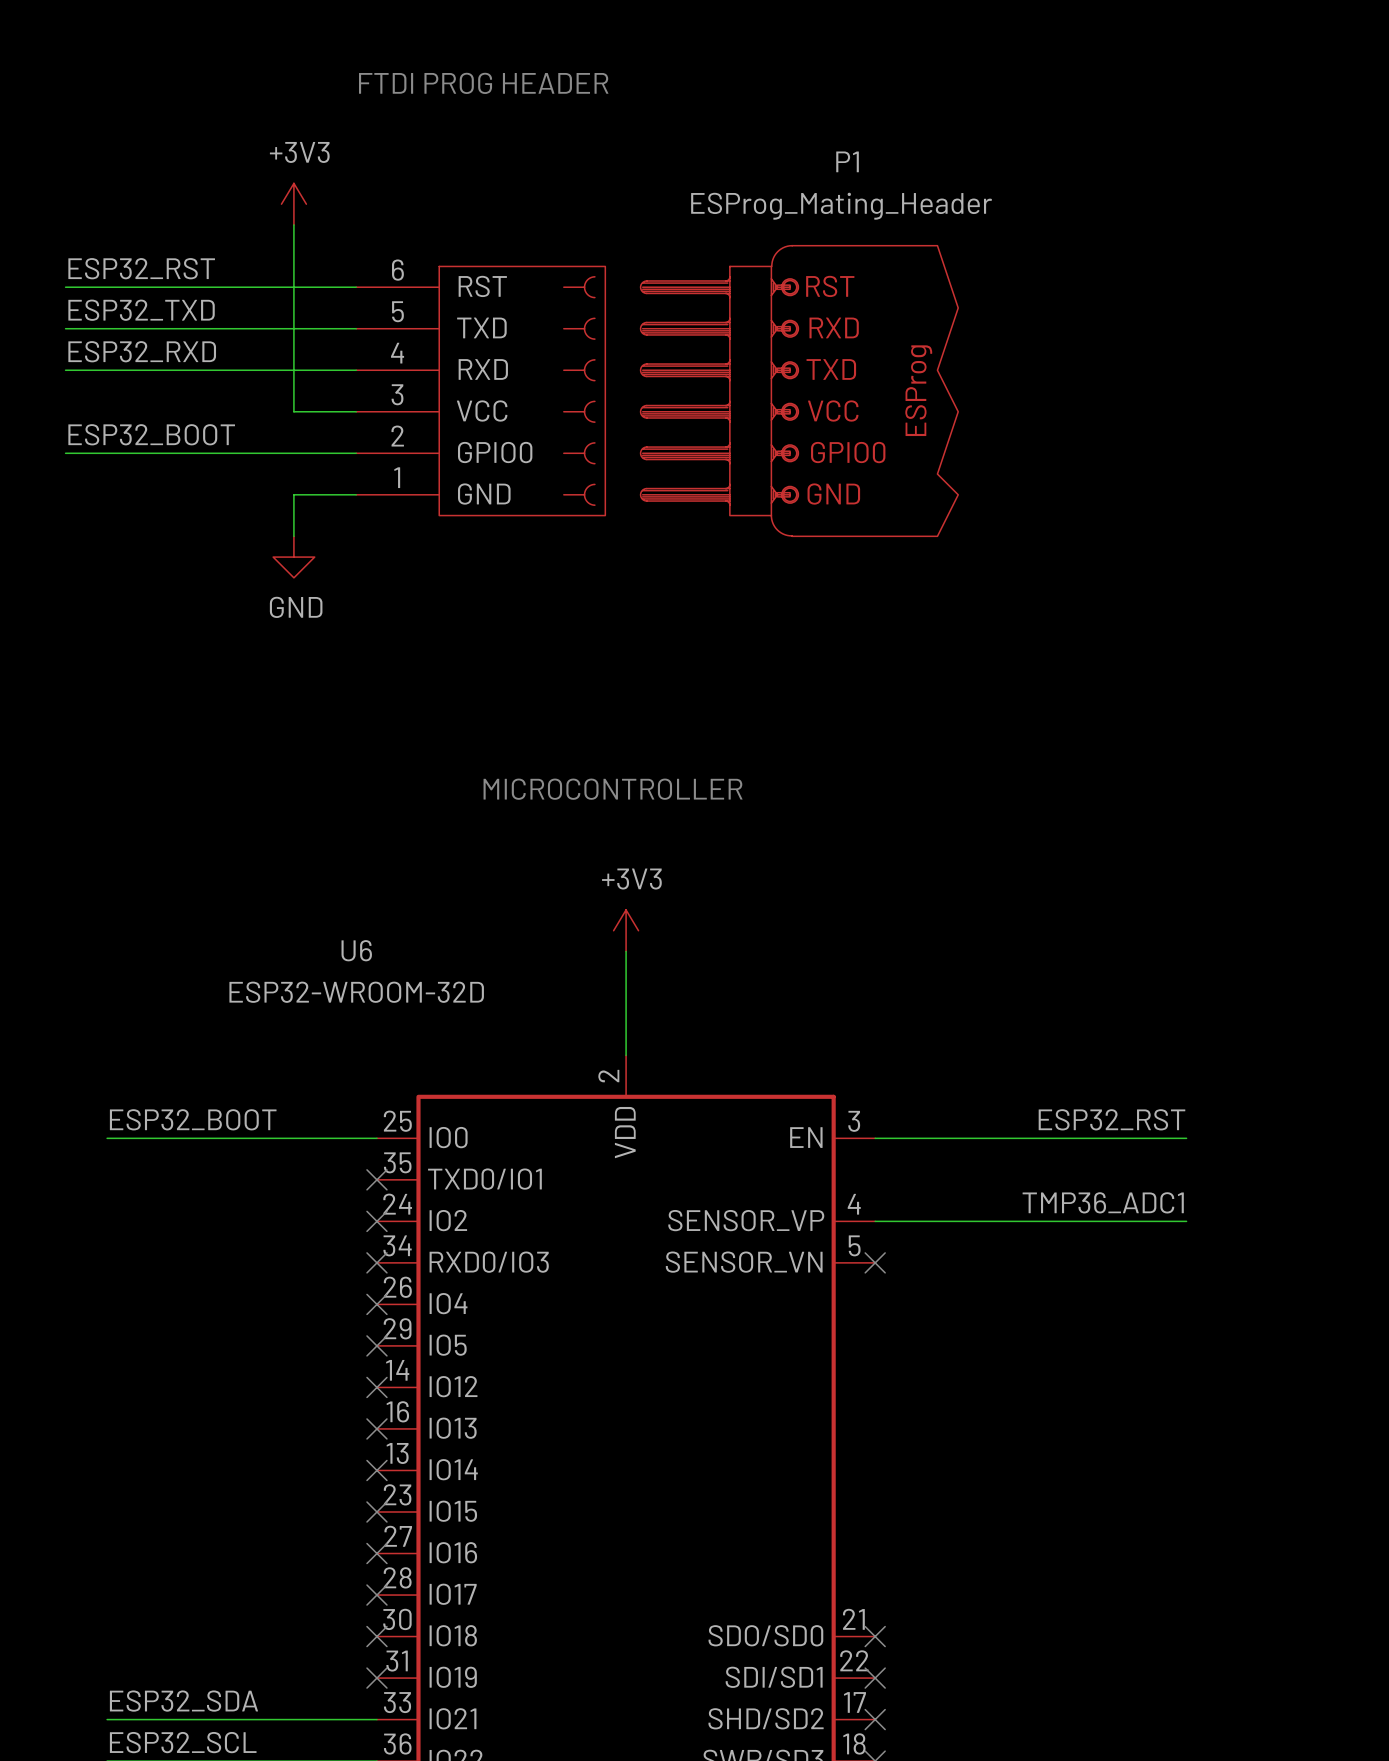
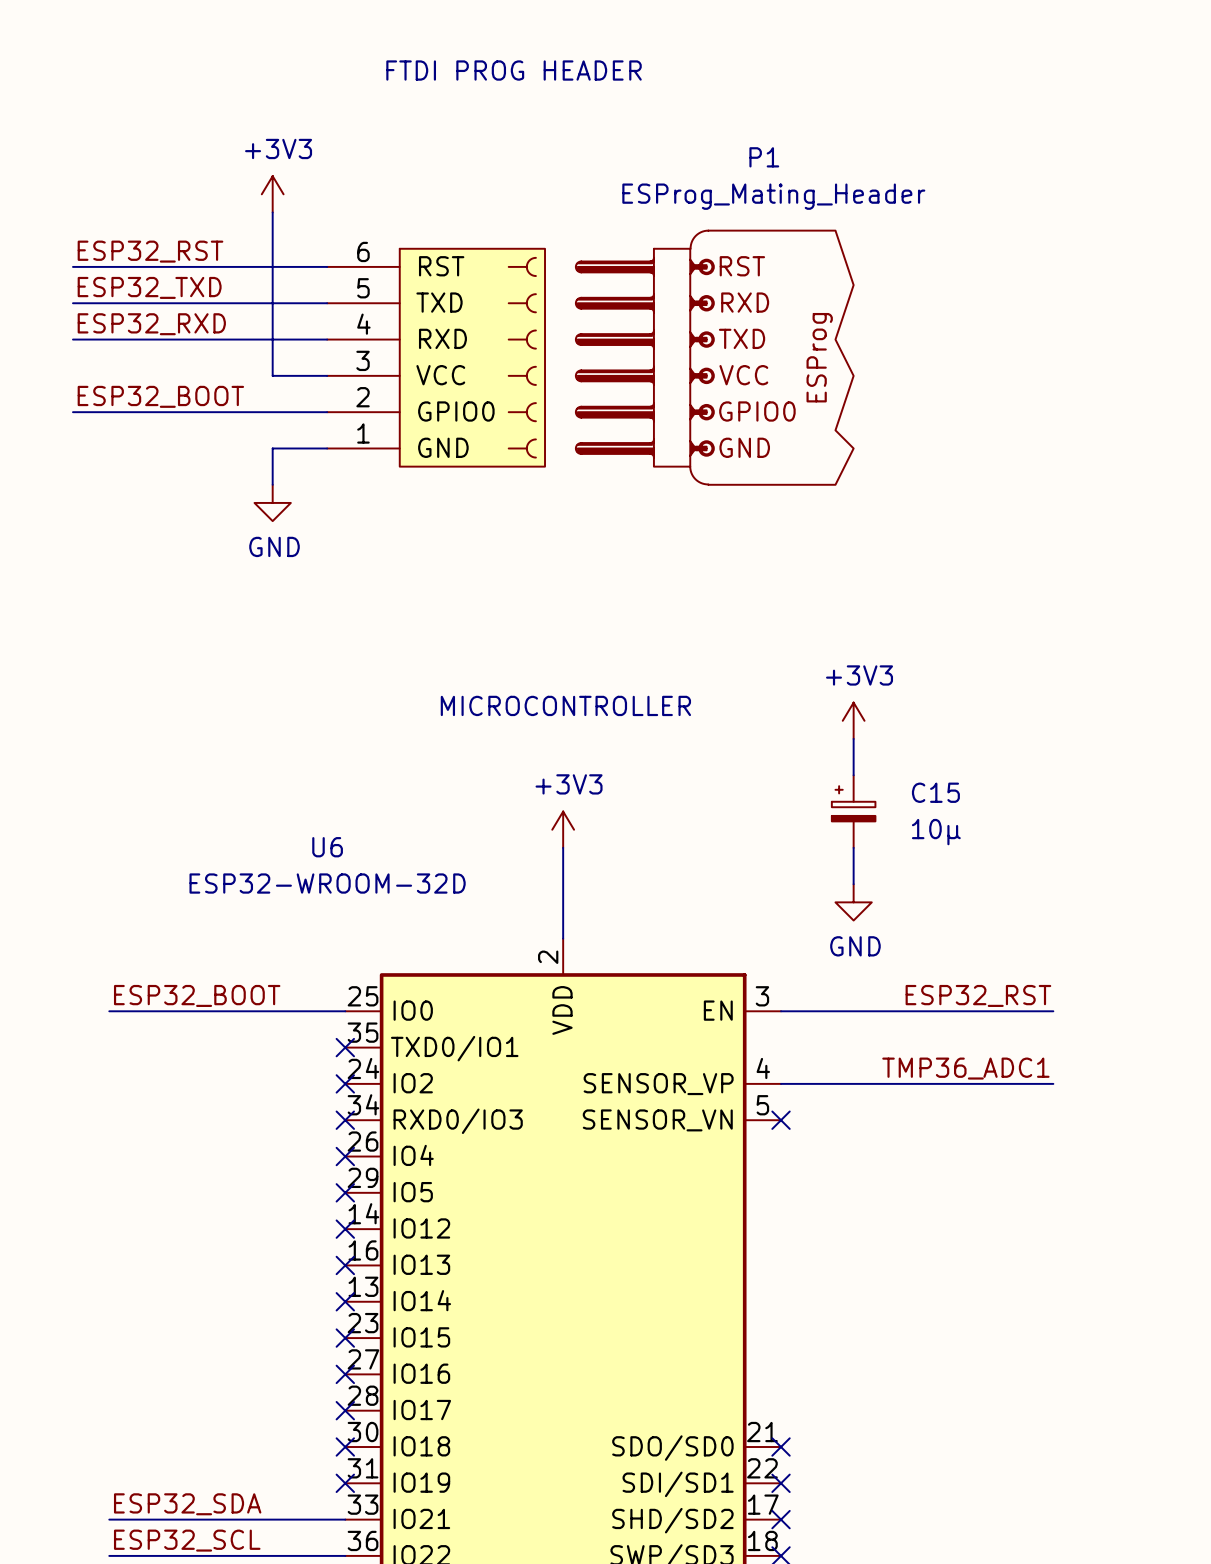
text position: FTDI PROG HEADER (483, 83) -> FTDI PROG HEADER (514, 70)
power symbol: none -> +3V3 (853, 720)
wire: none -> (853, 738) (853, 775)
C15: none -> 10µ (853, 811)
wire: none -> (853, 847) (853, 884)
power symbol: none -> GND (853, 902)

